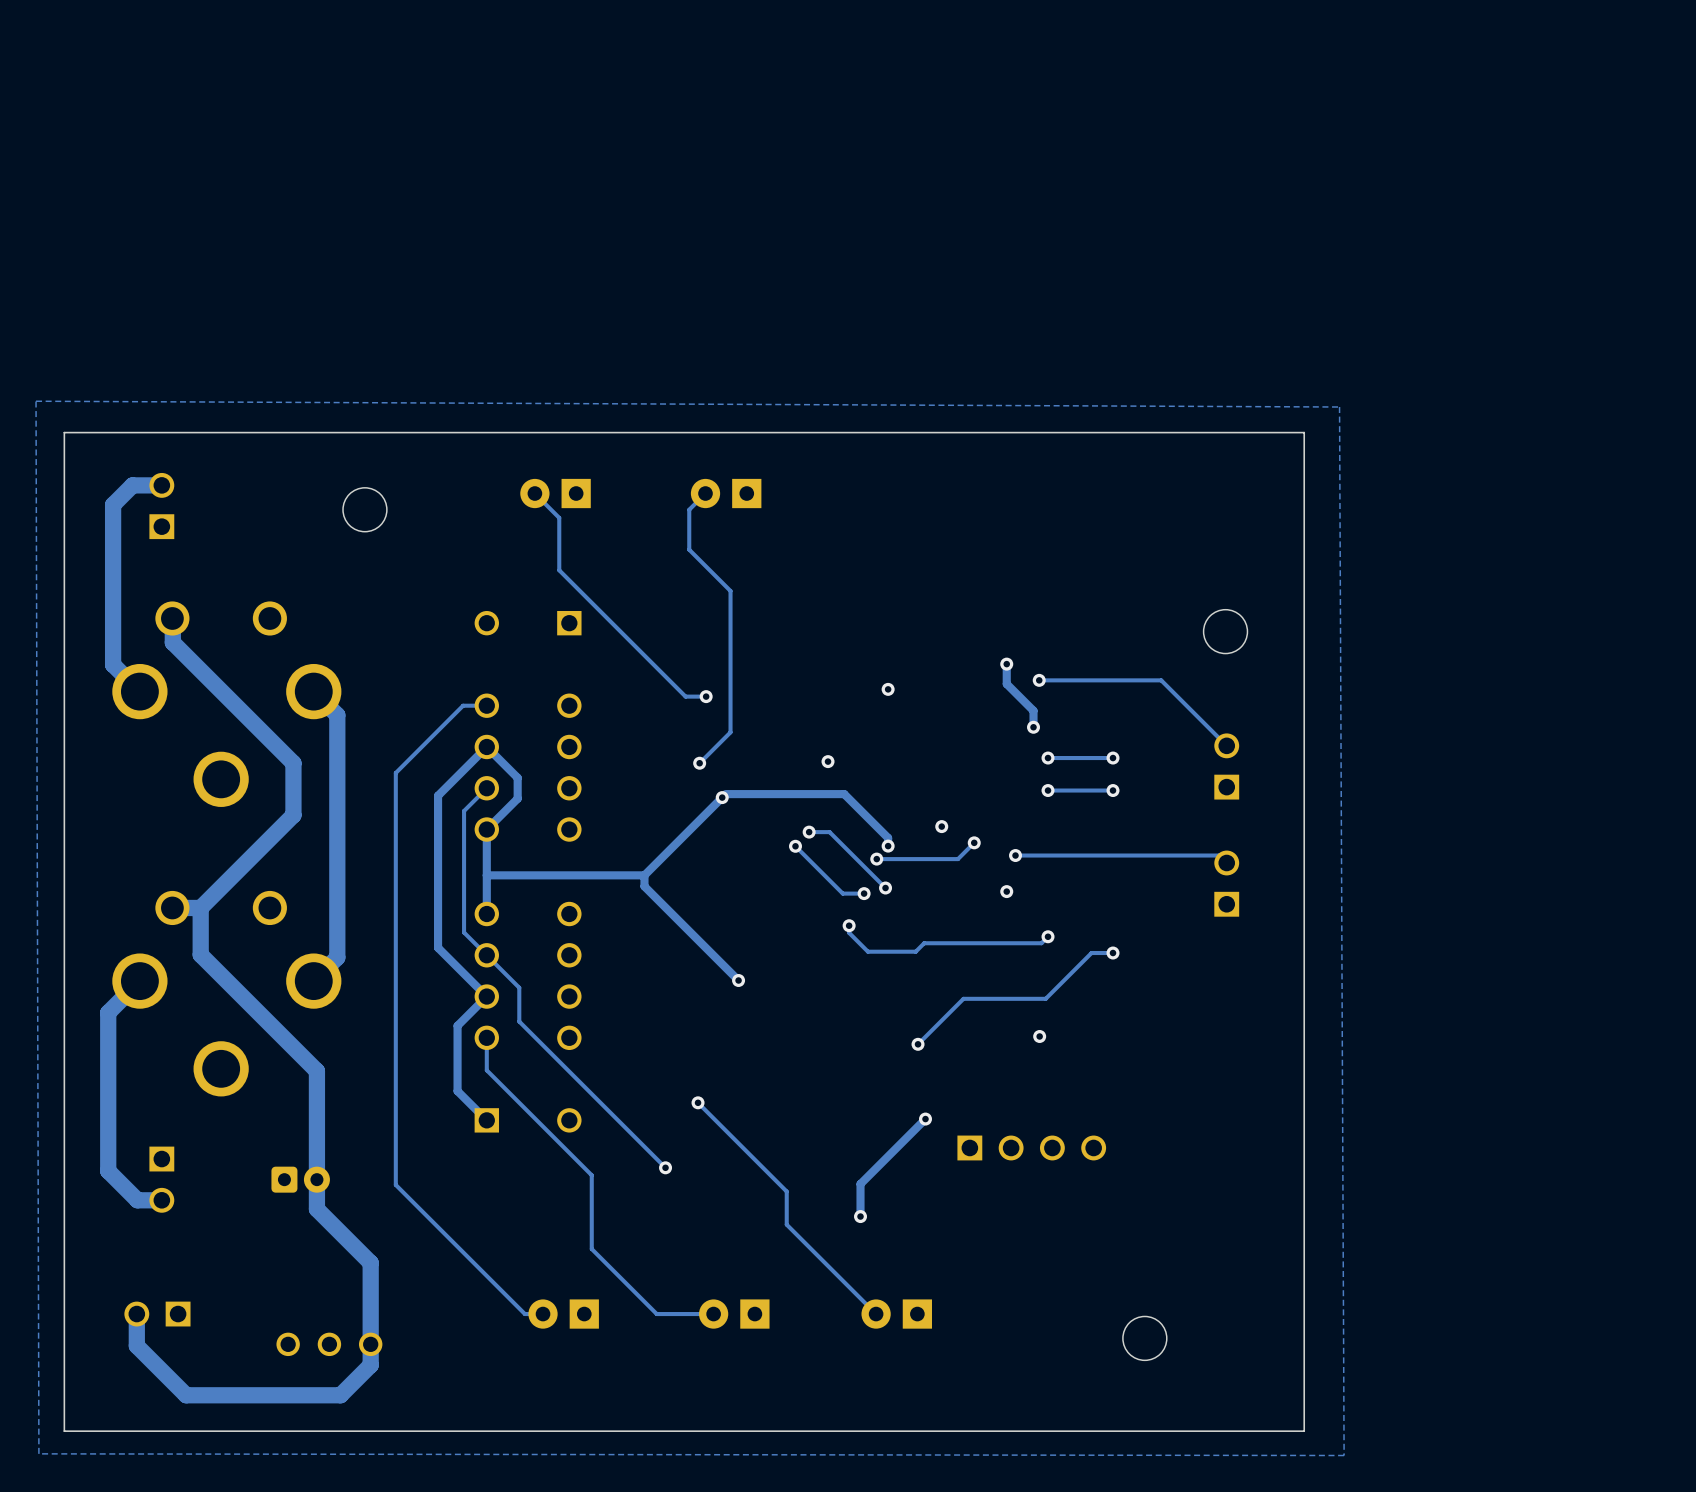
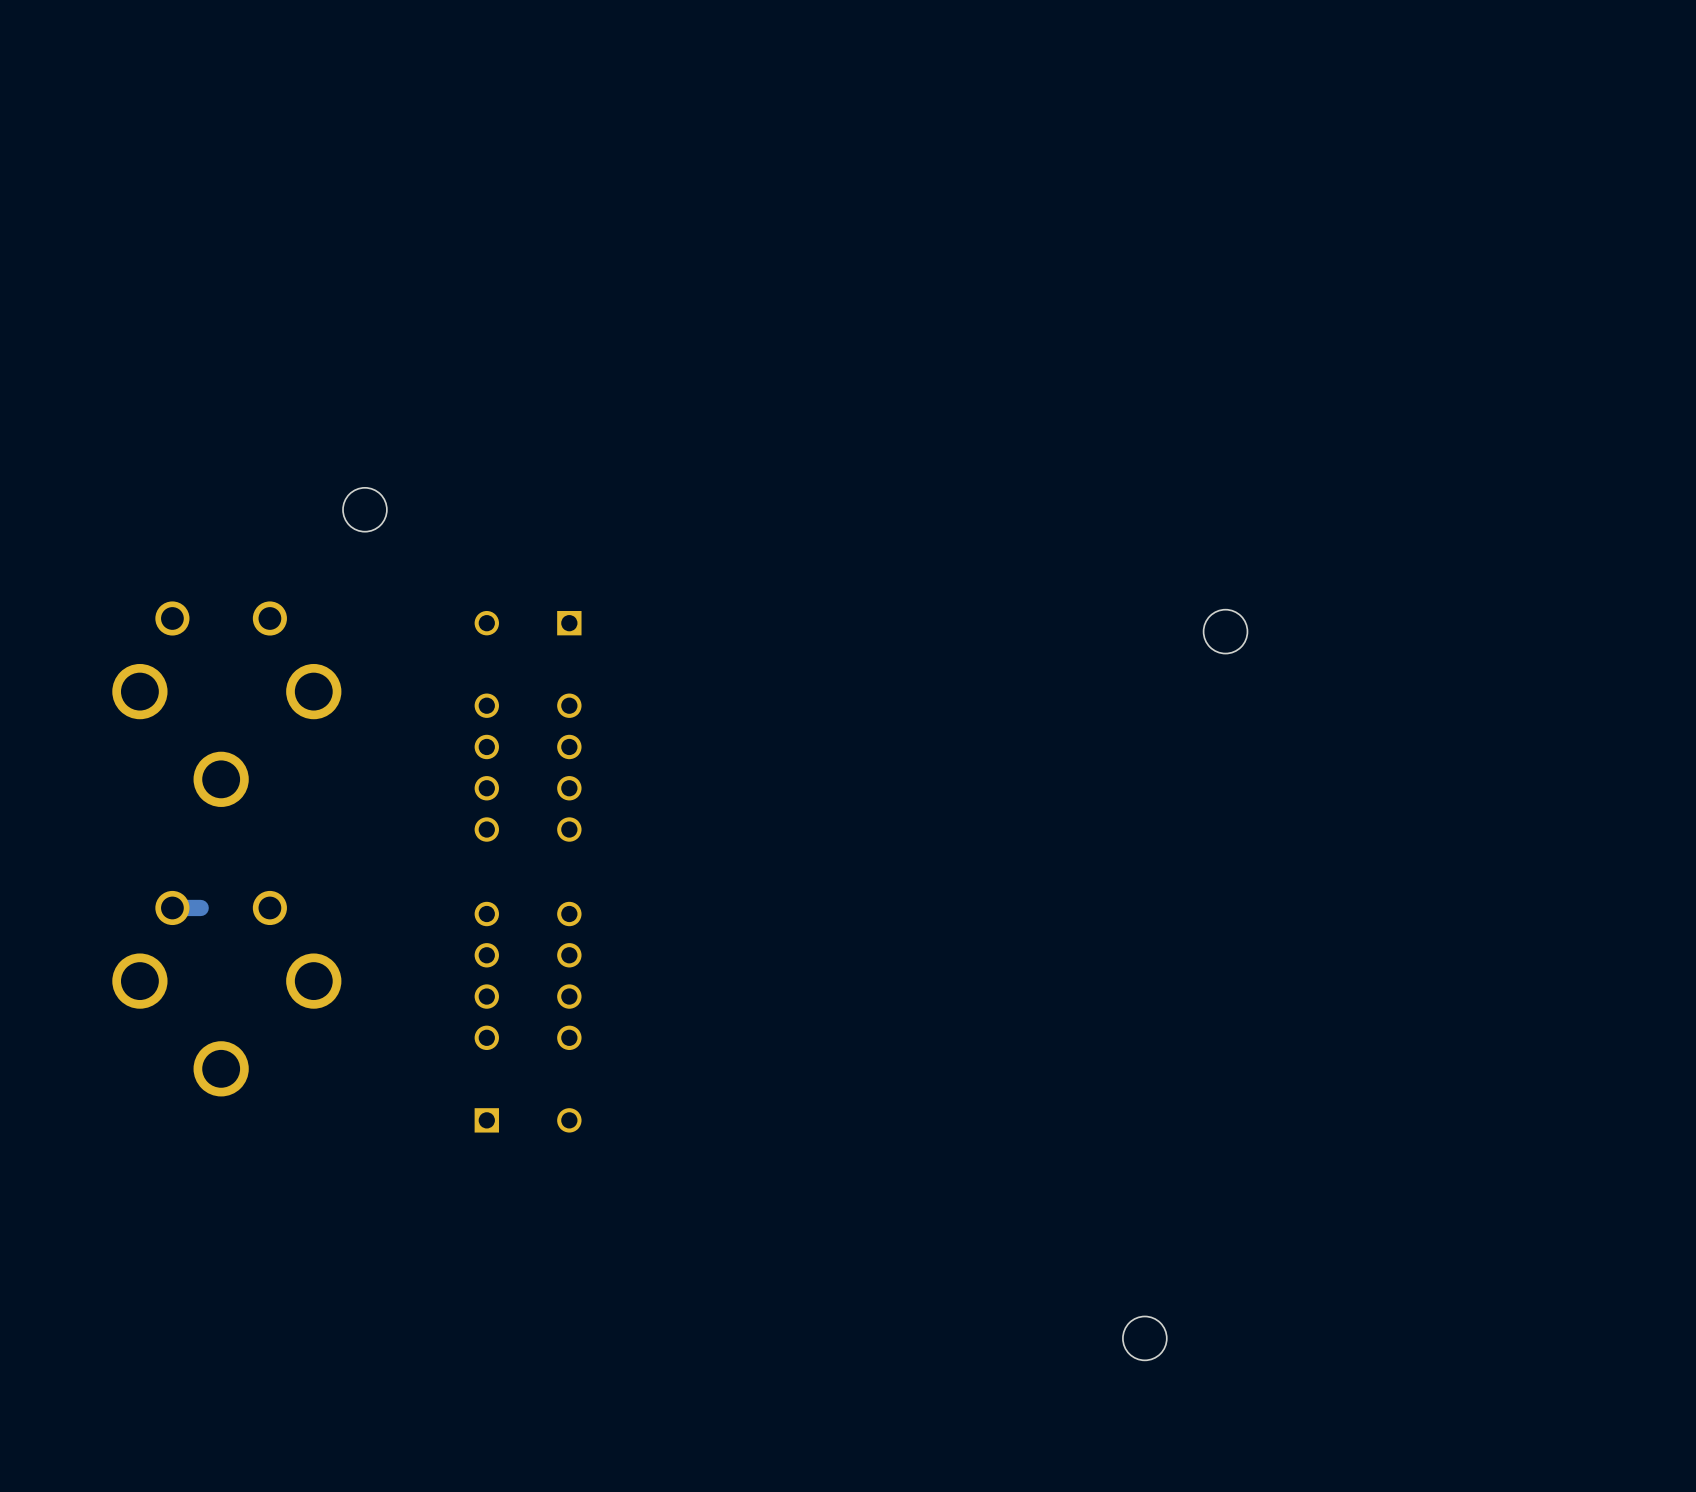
zone outline: (36, 401) (38, 1453) (1344, 1455) (1339, 407) (36, 401) -> none
board edge: (1304, 432) (64, 432) (64, 1431) (1304, 1431) (1304, 432) -> none
track: (161, 485) (132, 485) (113, 504) (113, 664) (139, 691) -> none
track: (534, 493) (559, 517) (559, 570) (685, 696) (706, 696) -> none
part: (555, 493) -> none
track: (705, 493) (689, 509) (689, 549) (730, 591) (730, 732) (699, 763) -> none
part: (726, 493) -> none
part: (161, 506) -> none
track: (172, 618) (172, 642) (293, 763) (293, 815) (200, 907) (200, 954) (316, 1071) (316, 1209) (370, 1262) (370, 1365) (340, 1395) (186, 1395) (136, 1345) (136, 1314) -> none
track: (1006, 664) (1006, 684) (1033, 710) (1033, 727) -> none
via: (1006, 664) -> none
track: (1039, 680) (1161, 680) (1226, 745) -> none
via: (1039, 680) -> none
via: (888, 689) -> none
track: (313, 691) (337, 715) (337, 957) (313, 981) -> none
via: (706, 696) -> none
track: (486, 705) (463, 705) (395, 772) (395, 1184) (524, 1314) (543, 1314) -> none
via: (1033, 727) -> none
via: (1048, 758) -> none
track: (1113, 758) (1048, 758) -> none
via: (1113, 758) -> none
via: (828, 761) -> none
via: (699, 763) -> none
part: (1226, 766) -> none
track: (486, 788) (464, 811) (464, 932) (519, 987) (519, 1021) (665, 1167) -> none
via: (1048, 790) -> none
track: (1113, 790) (1048, 790) -> none
via: (1113, 790) -> none
via: (722, 797) -> none
via: (941, 826) -> none
track: (809, 832) (829, 832) (885, 888) -> none
via: (809, 832) -> none
track: (974, 842) (957, 859) (876, 859) -> none
via: (974, 842) -> none
track: (795, 846) (842, 893) (864, 893) -> none
via: (795, 846) -> none
track: (888, 846) (888, 837) (844, 794) (725, 794) (644, 875) -> none
via: (888, 846) -> none
track: (1015, 855) (1219, 855) (1226, 862) -> none
via: (1015, 855) -> none
via: (876, 859) -> none
track: (644, 875) (486, 875) -> none
track: (644, 875) (644, 886) (738, 980) -> none
part: (1226, 883) -> none
via: (885, 888) -> none
via: (1006, 891) -> none
via: (864, 893) -> none
track: (486, 914) (486, 829) (517, 798) (517, 777) (486, 746) (438, 795) (438, 947) (486, 996) (457, 1025) (457, 1091) (486, 1120) -> none
track: (849, 925) (849, 932) (867, 951) (915, 951) (924, 943) (1041, 943) (1048, 936) -> none
via: (849, 925) -> none
via: (1048, 936) -> none
track: (1113, 953) (1091, 953) (1045, 998) (963, 998) (918, 1044) -> none
via: (1113, 953) -> none
via: (738, 980) -> none
track: (139, 981) (108, 1012) (108, 1171) (137, 1200) (161, 1200) -> none
via: (1039, 1036) -> none
track: (486, 1037) (486, 1070) (591, 1175) (591, 1249) (656, 1314) (713, 1314) -> none
via: (918, 1044) -> none
track: (698, 1102) (786, 1191) (786, 1224) (876, 1314) -> none
via: (698, 1102) -> none
track: (925, 1119) (860, 1184) (860, 1216) -> none
via: (925, 1119) -> none
part: (1031, 1147) -> none
via: (665, 1167) -> none
part: (161, 1179) -> none
part: (300, 1179) -> none
via: (860, 1216) -> none
part: (157, 1314) -> none
part: (563, 1314) -> none
part: (734, 1314) -> none
part: (896, 1314) -> none
part: (329, 1344) -> none

